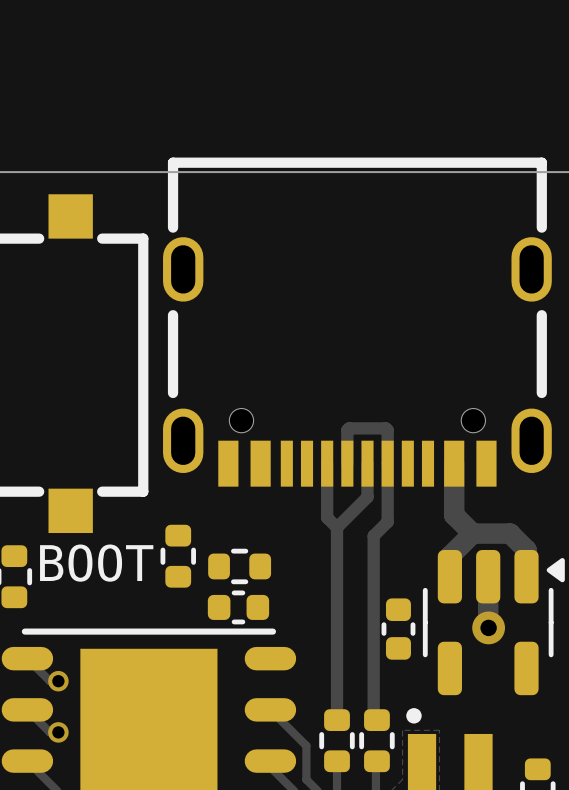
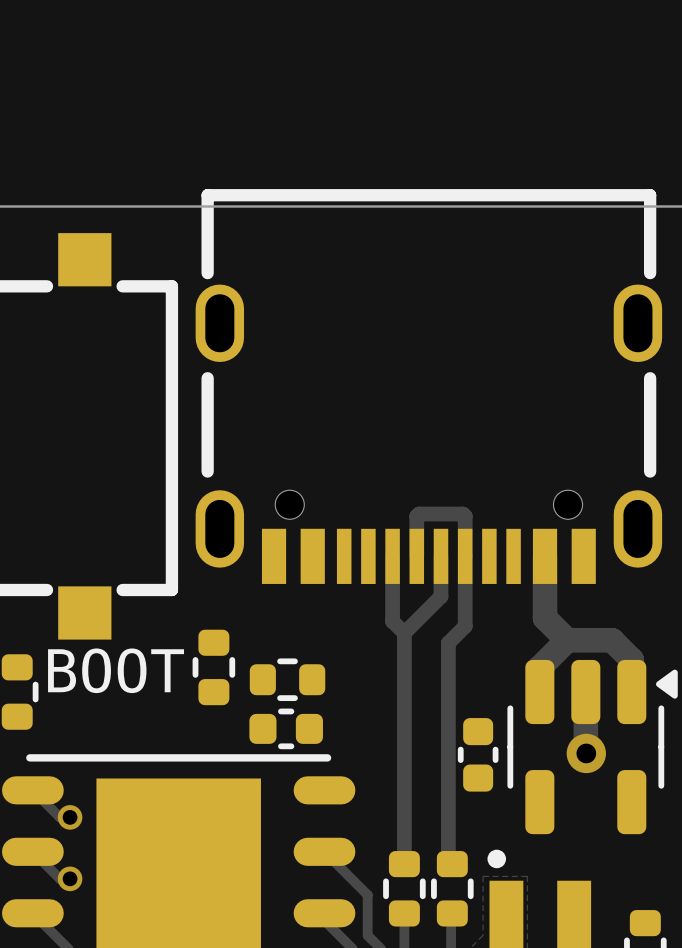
BOOT name: none -> BOOT (116, 670)
BOOT value: BOOT (96, 563) -> none

